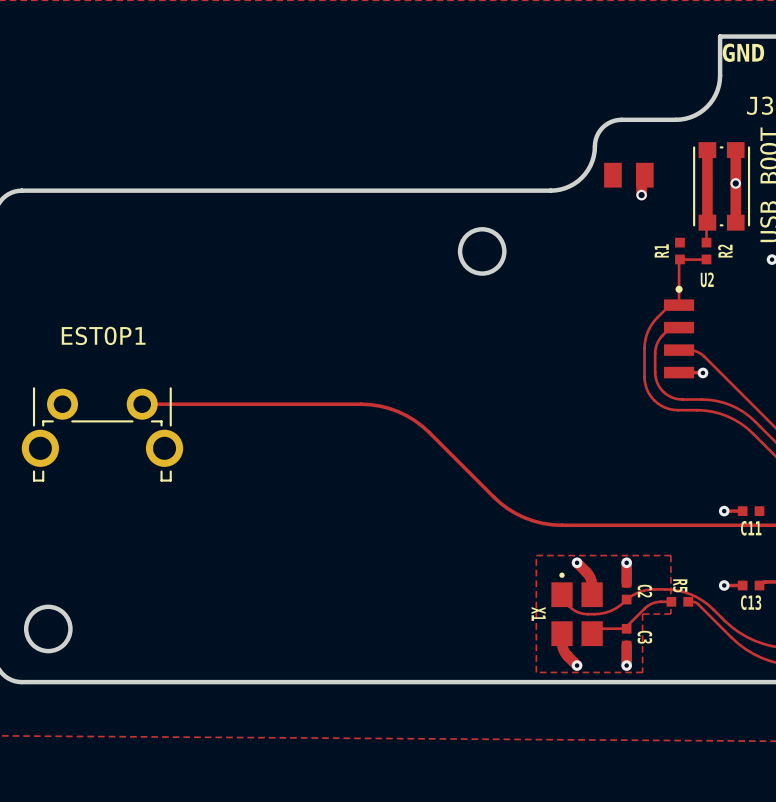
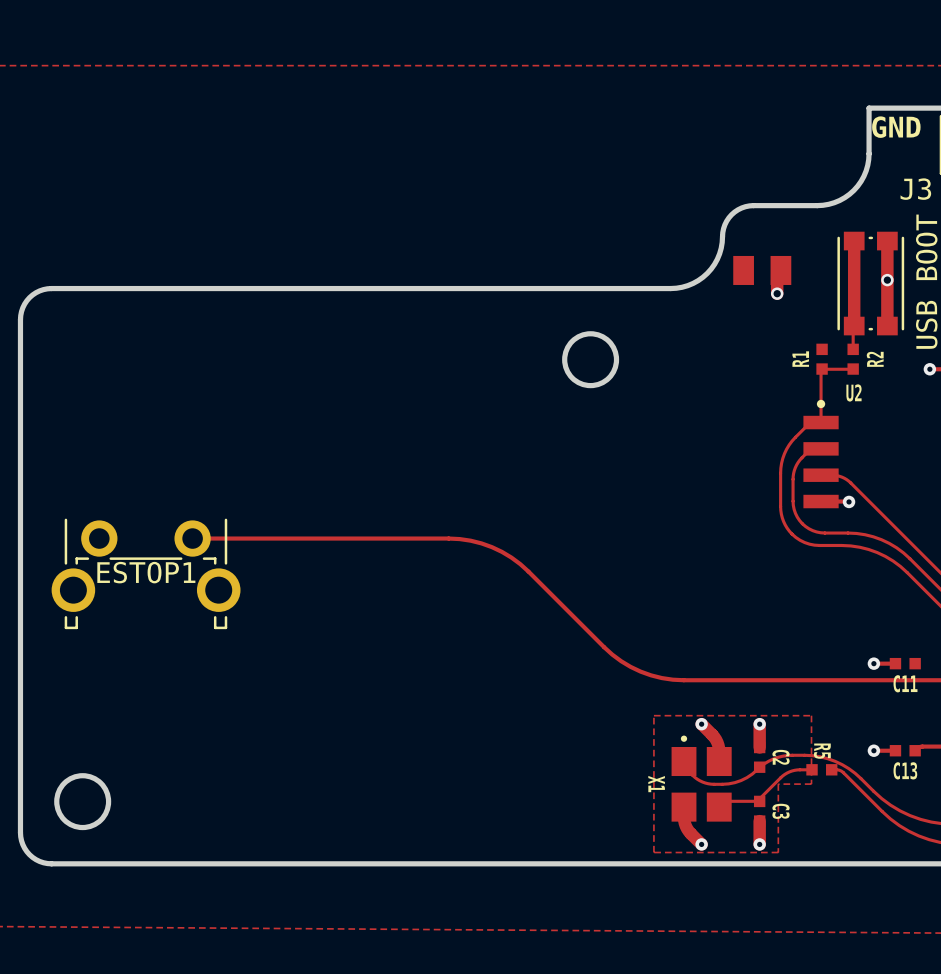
ESTOP1 name position: ESTOP1 (103, 335) -> ESTOP1 (146, 572)

